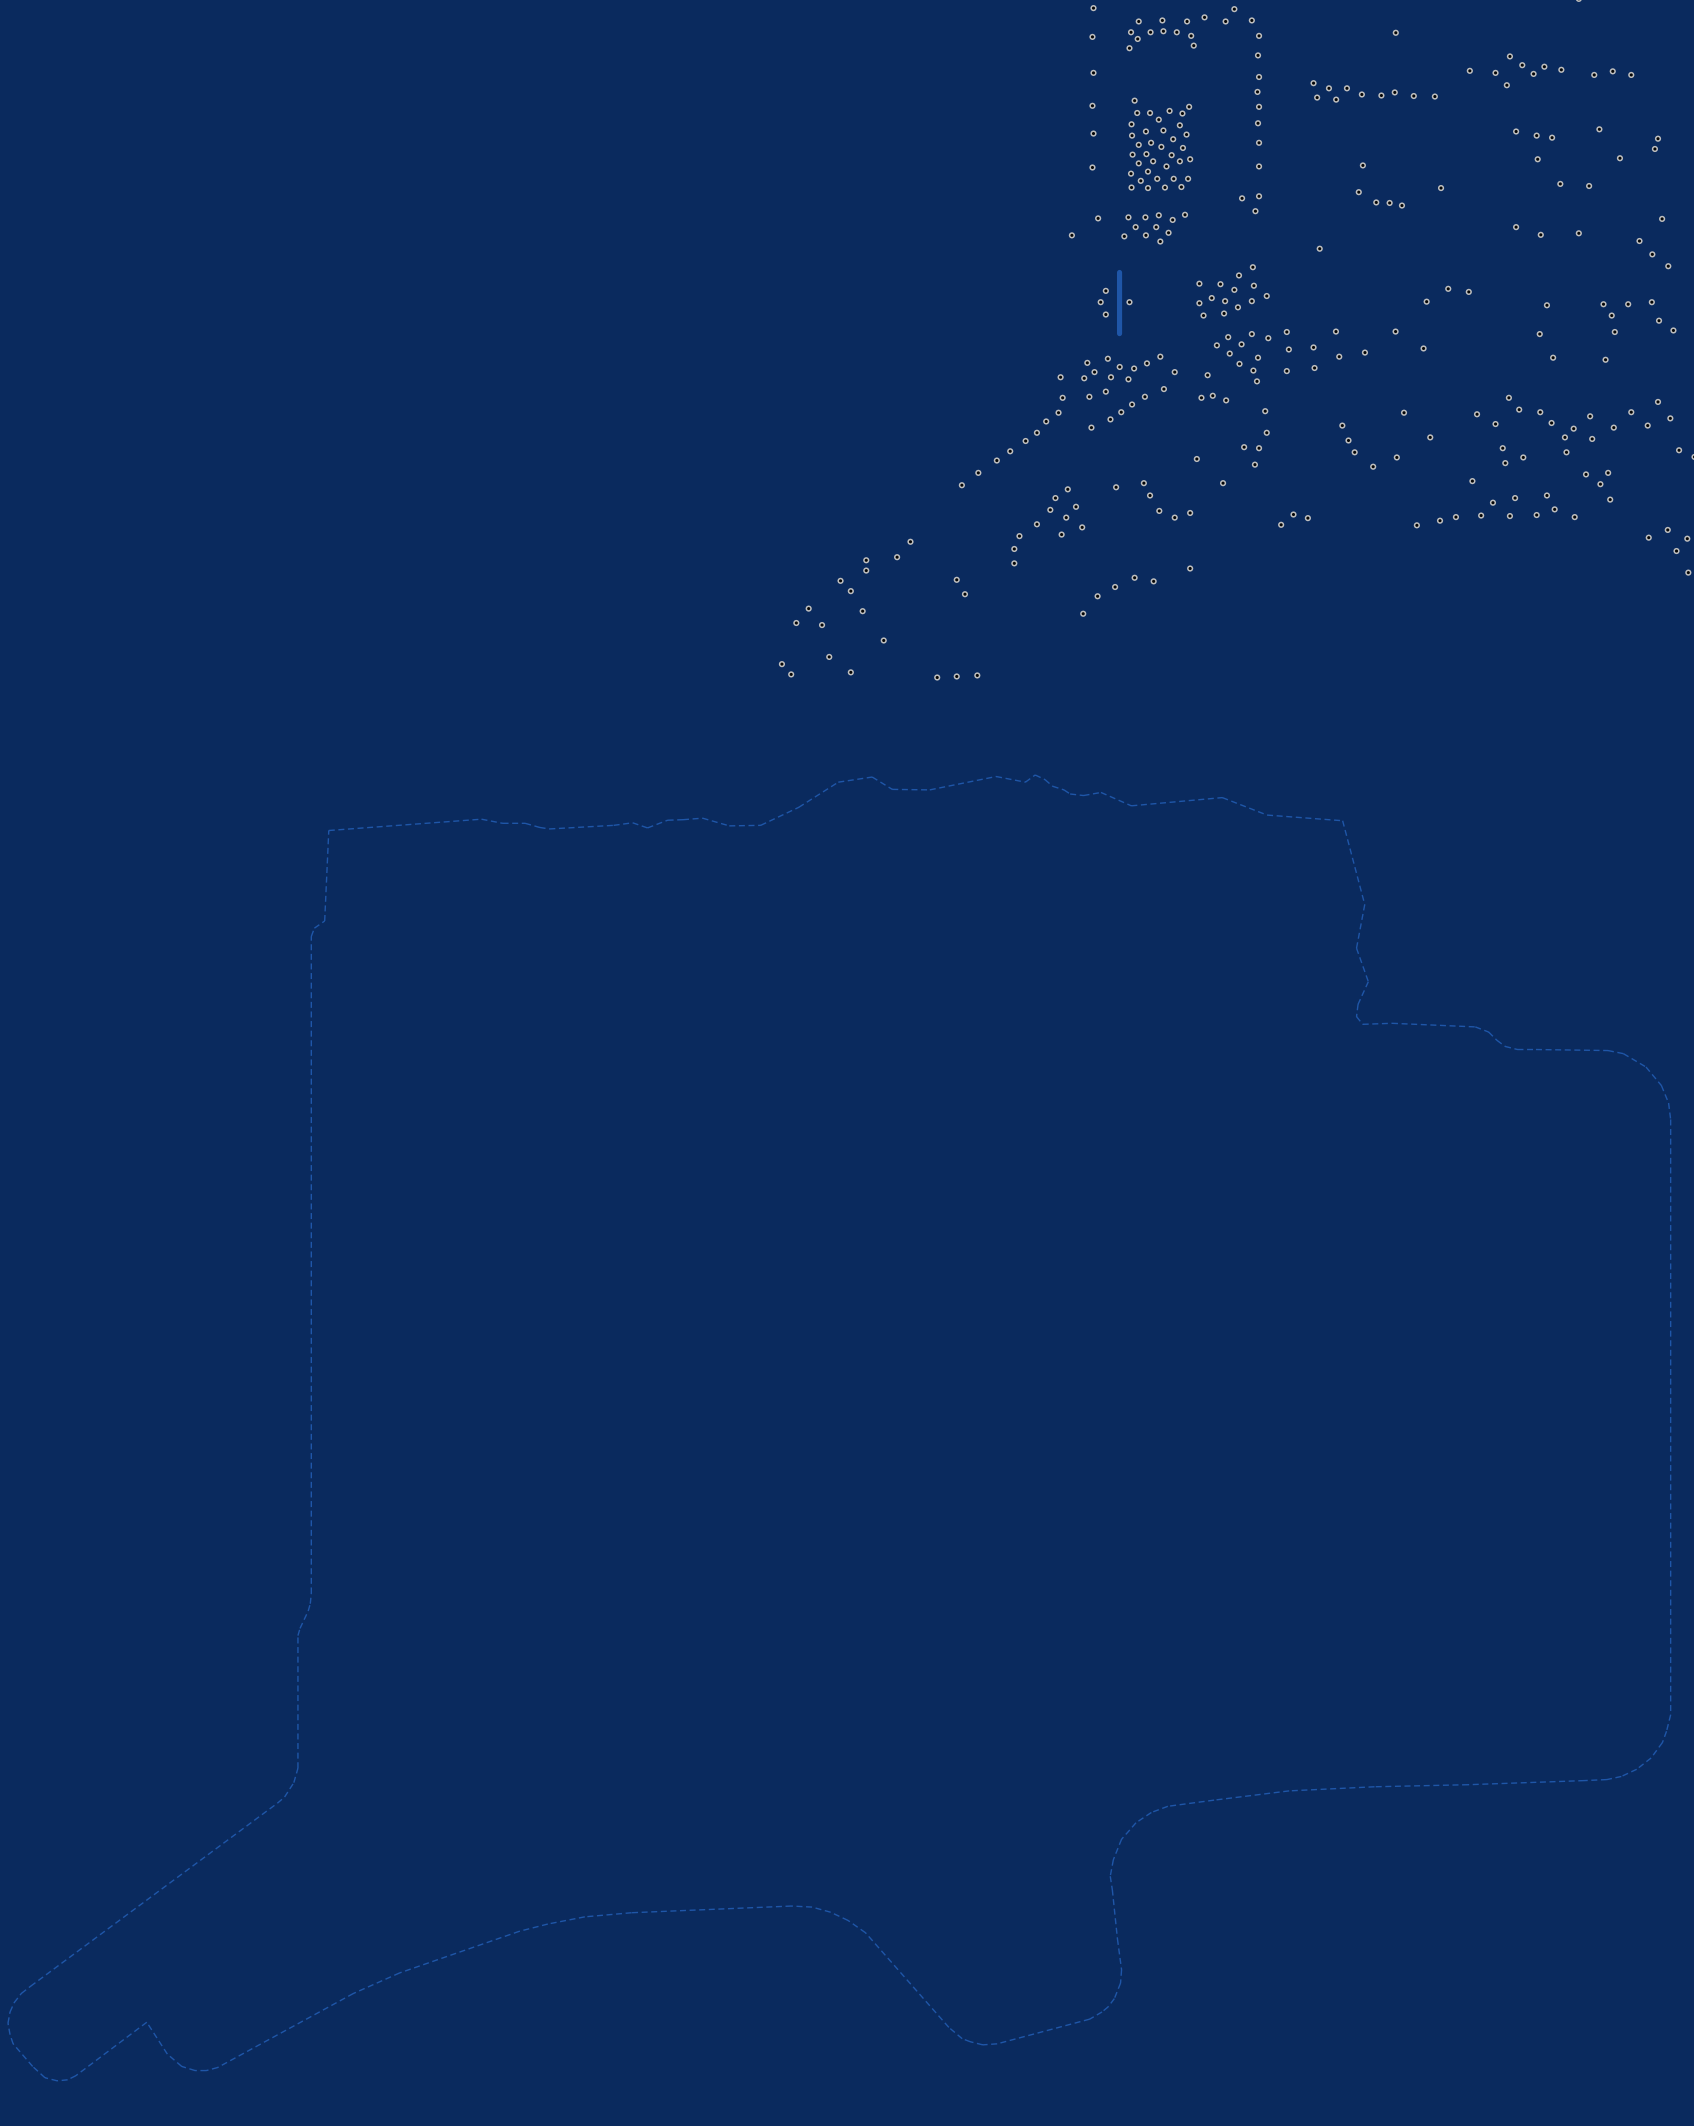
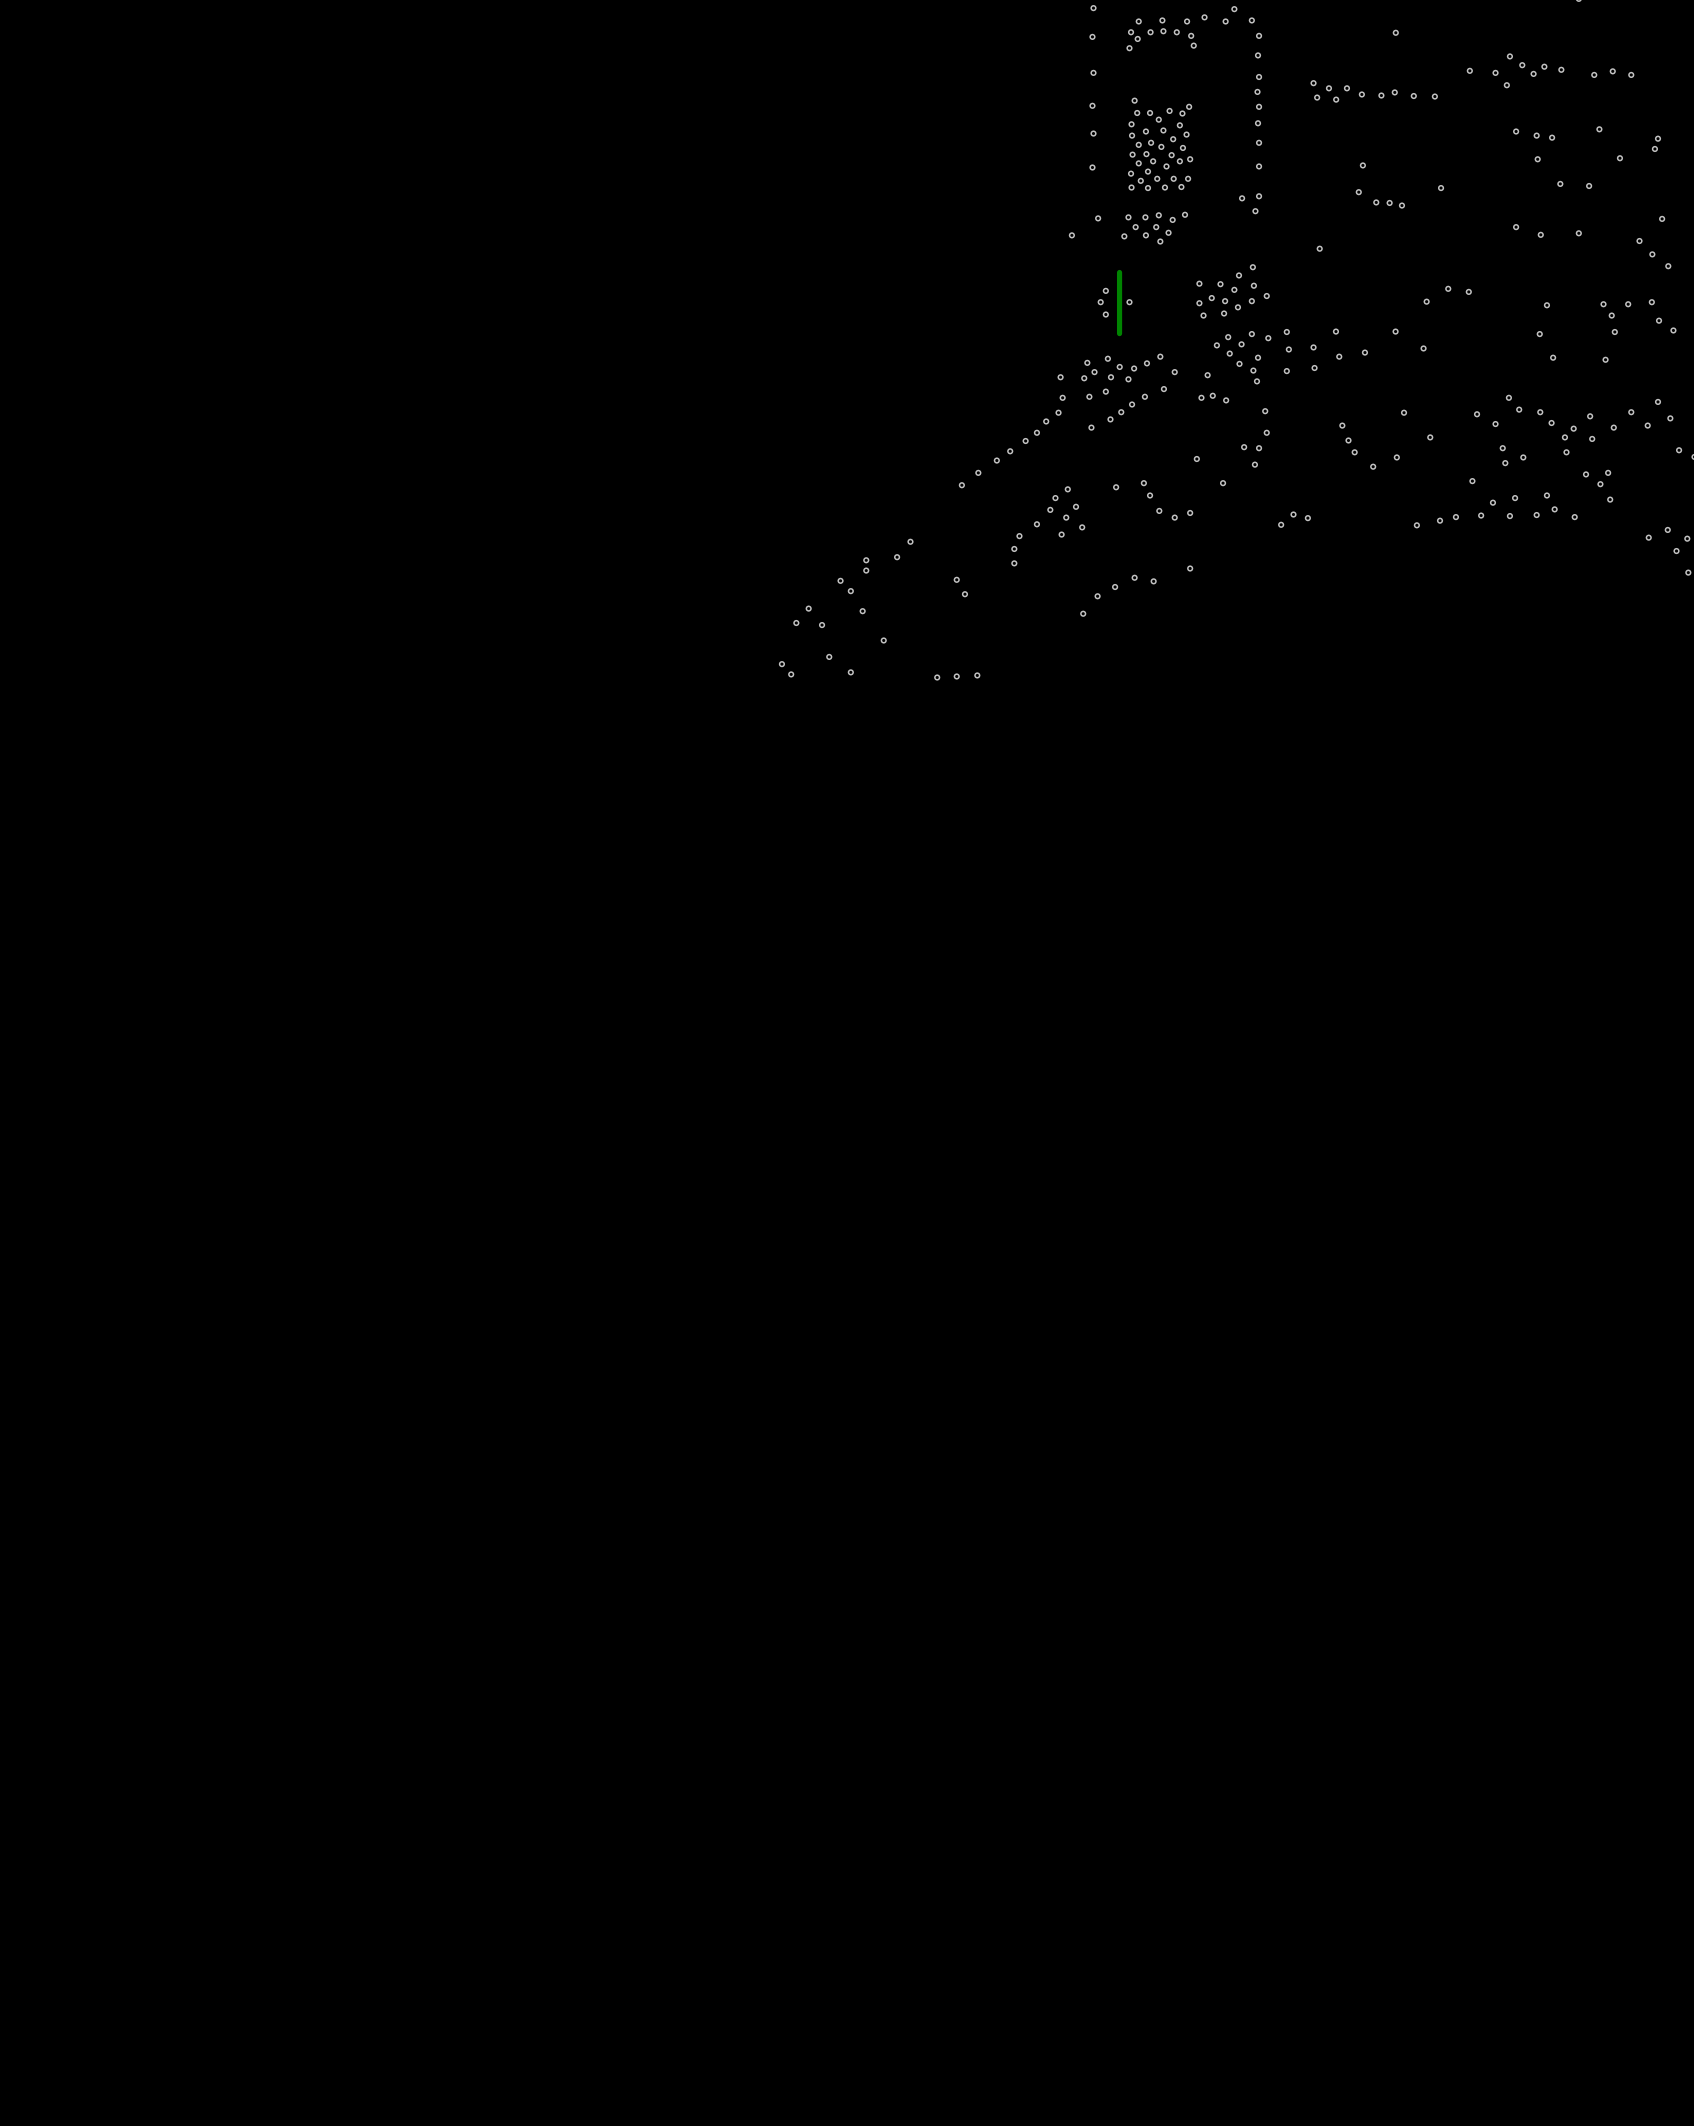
zone outline: (1035, 774) (1025, 782) (996, 776) (929, 789) (892, 789) (872, 777) (838, 782) (798, 807) (760, 825) (729, 825) (702, 818) (667, 820) (647, 827) (632, 822) (549, 828) (525, 823) (502, 823) (481, 819) (328, 830) (324, 920) (314, 928) (311, 936) (311, 1593) (308, 1610) (297, 1635) (297, 1768) (293, 1782) (284, 1797) (277, 1803) (21, 1993) (10, 2011) (7, 2023) (10, 2034) (13, 2043) (44, 2077) (57, 2080) (67, 2079) (75, 2075) (146, 2022) (167, 2054) (181, 2066) (195, 2070) (206, 2070) (217, 2067) (353, 1993) (399, 1972) (519, 1931) (547, 1924) (584, 1916) (631, 1912) (791, 1906) (812, 1907) (830, 1912) (848, 1920) (865, 1932) (948, 2027) (962, 2038) (982, 2044) (997, 2043) (1089, 2019) (1108, 2006) (1114, 1998) (1120, 1983) (1121, 1969) (1110, 1876) (1113, 1859) (1121, 1839) (1135, 1822) (1151, 1812) (1167, 1806) (1289, 1790) (1606, 1779) (1621, 1776) (1636, 1769) (1651, 1757) (1662, 1742) (1670, 1714) (1670, 1119) (1668, 1102) (1661, 1085) (1645, 1066) (1623, 1053) (1607, 1050) (1517, 1049) (1505, 1046) (1488, 1032) (1475, 1026) (1391, 1023) (1362, 1024) (1356, 1016) (1358, 1004) (1368, 981) (1356, 948) (1364, 904) (1342, 820) (1267, 815) (1222, 797) (1131, 805) (1101, 792) (1083, 795) (1070, 793) (1052, 786) (1035, 774) -> none

